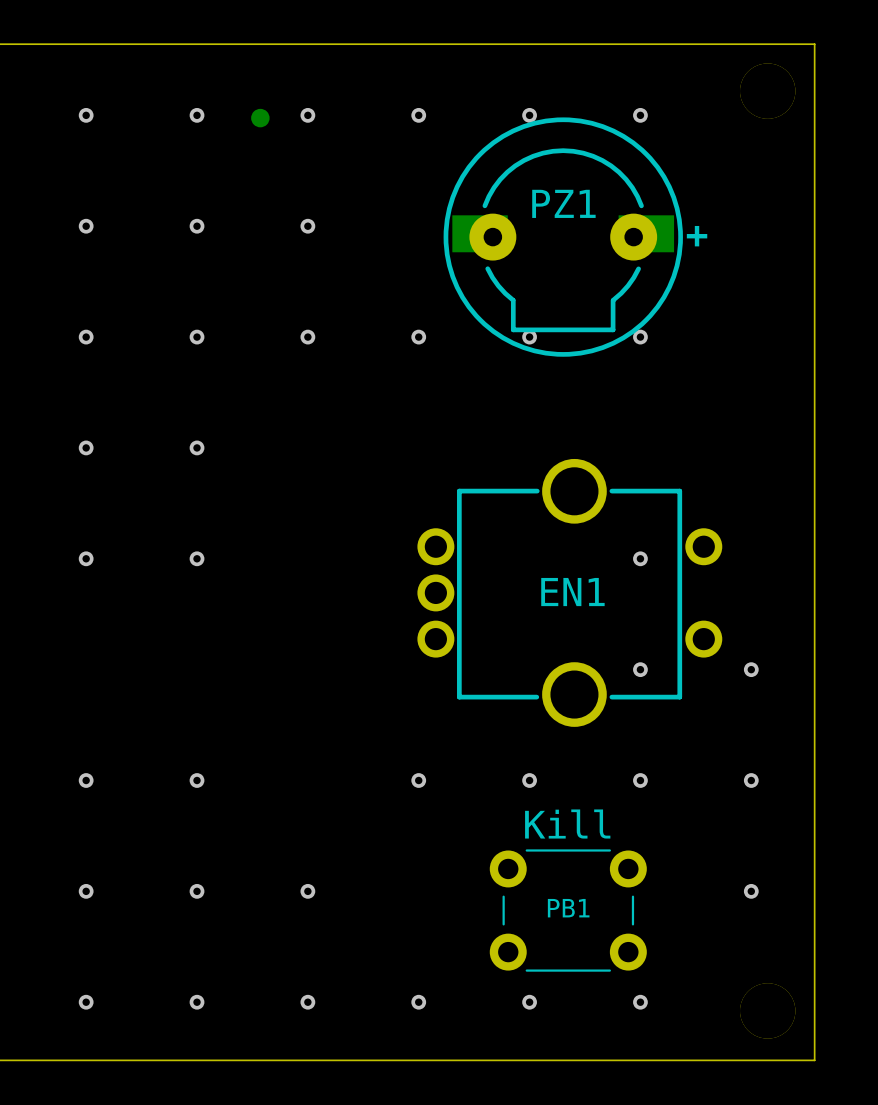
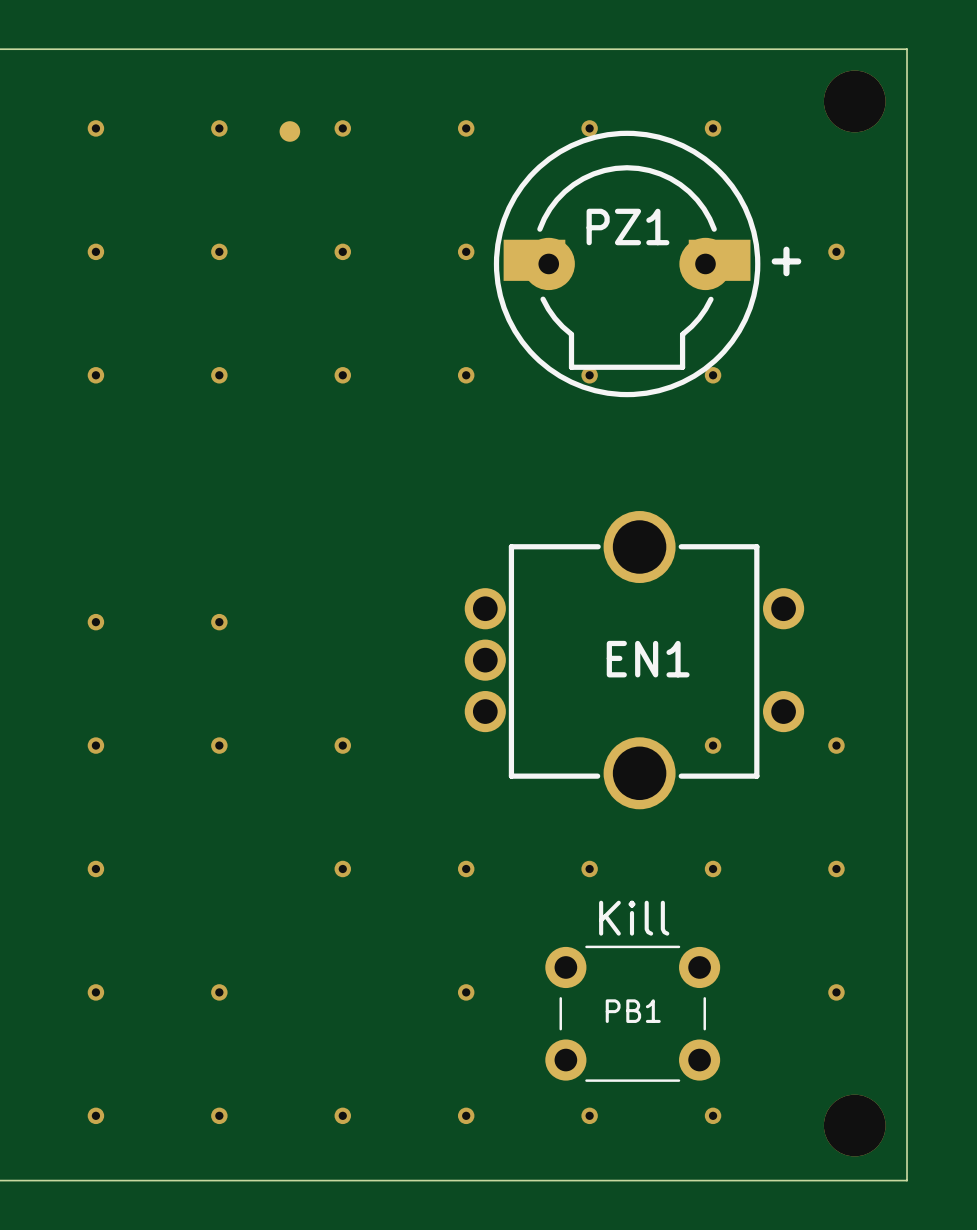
via: none -> (466, 251)
via: none -> (836, 251)
via: (86, 447) -> none
via: (197, 447) -> none
via: (640, 558) -> none
via: none -> (95, 745)
via: none -> (219, 745)
via: none -> (342, 745)
via: (197, 780) -> none
via: none -> (342, 868)
via: (307, 891) -> none
via: none -> (466, 992)

